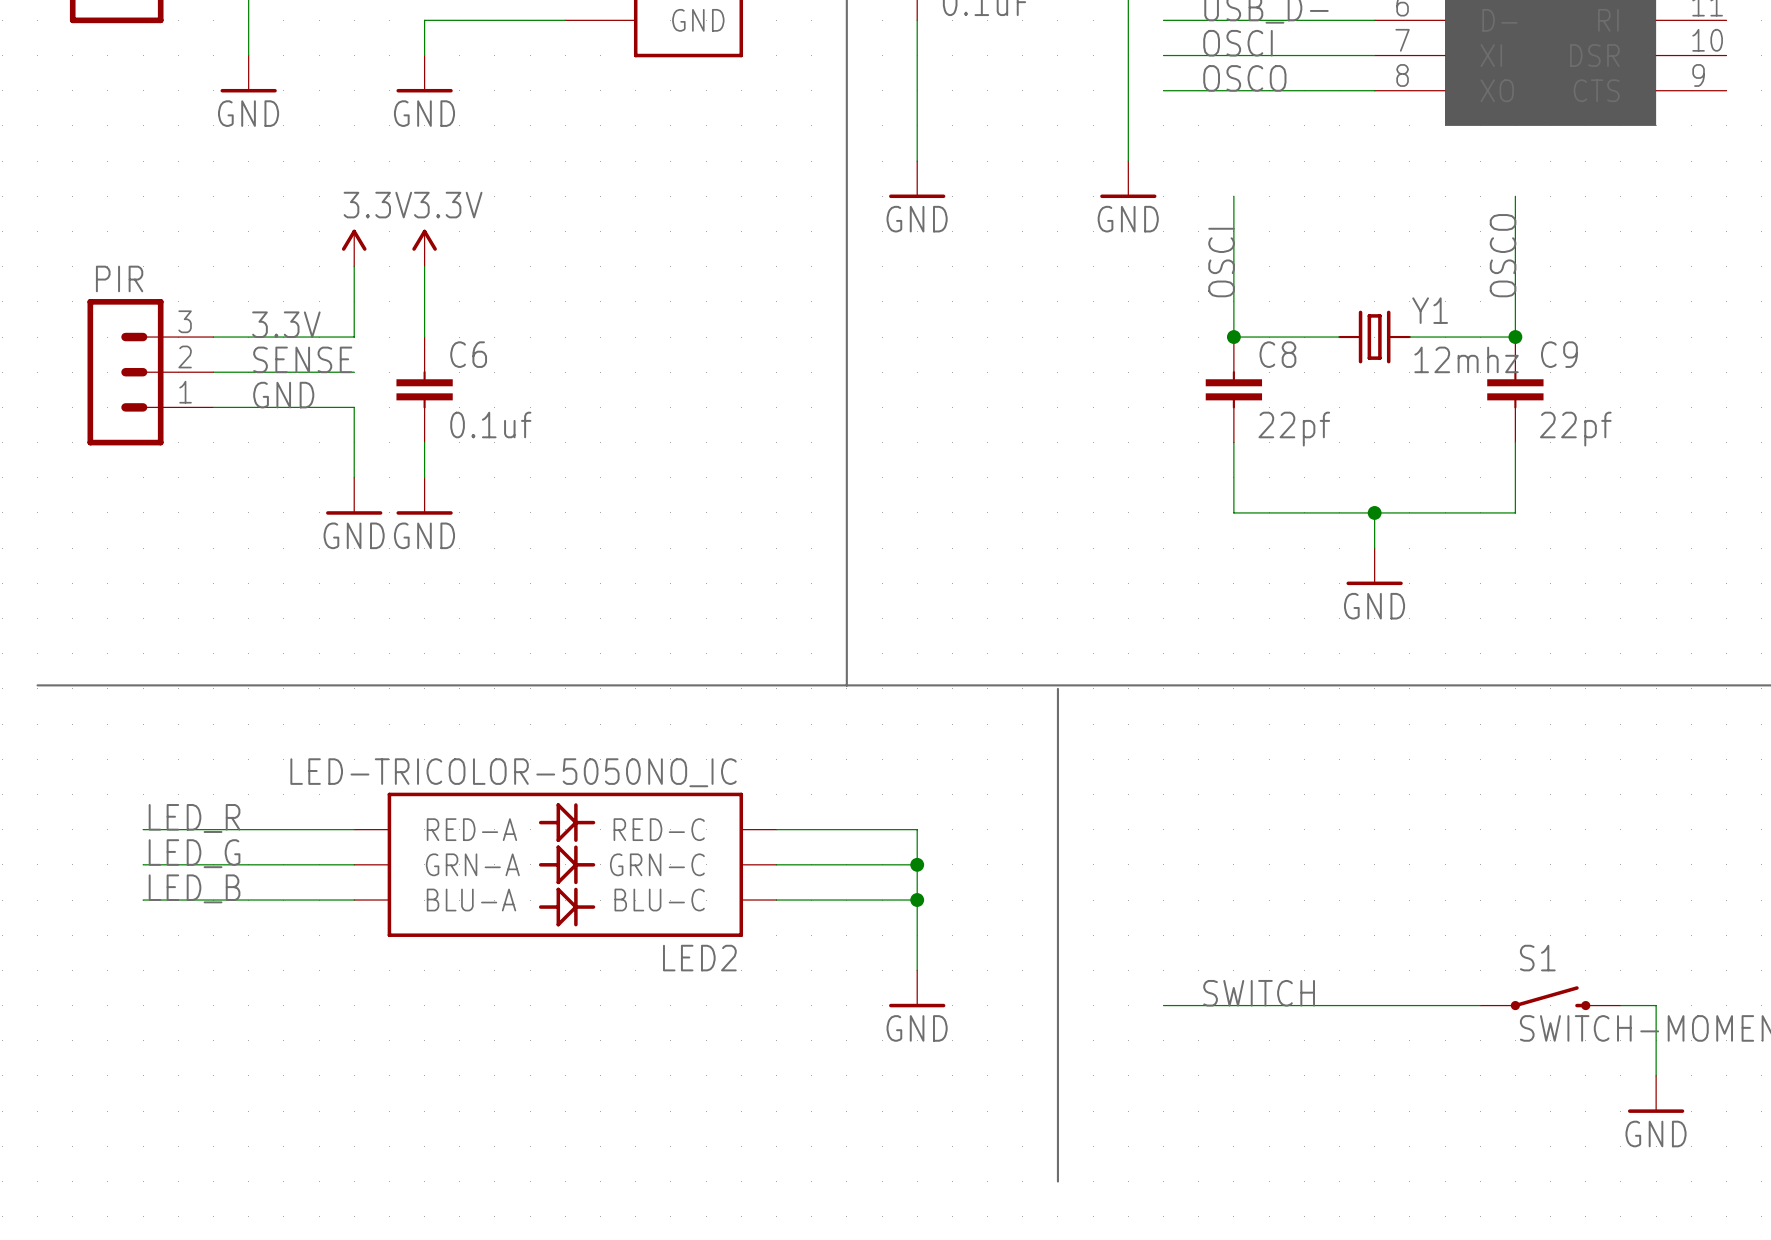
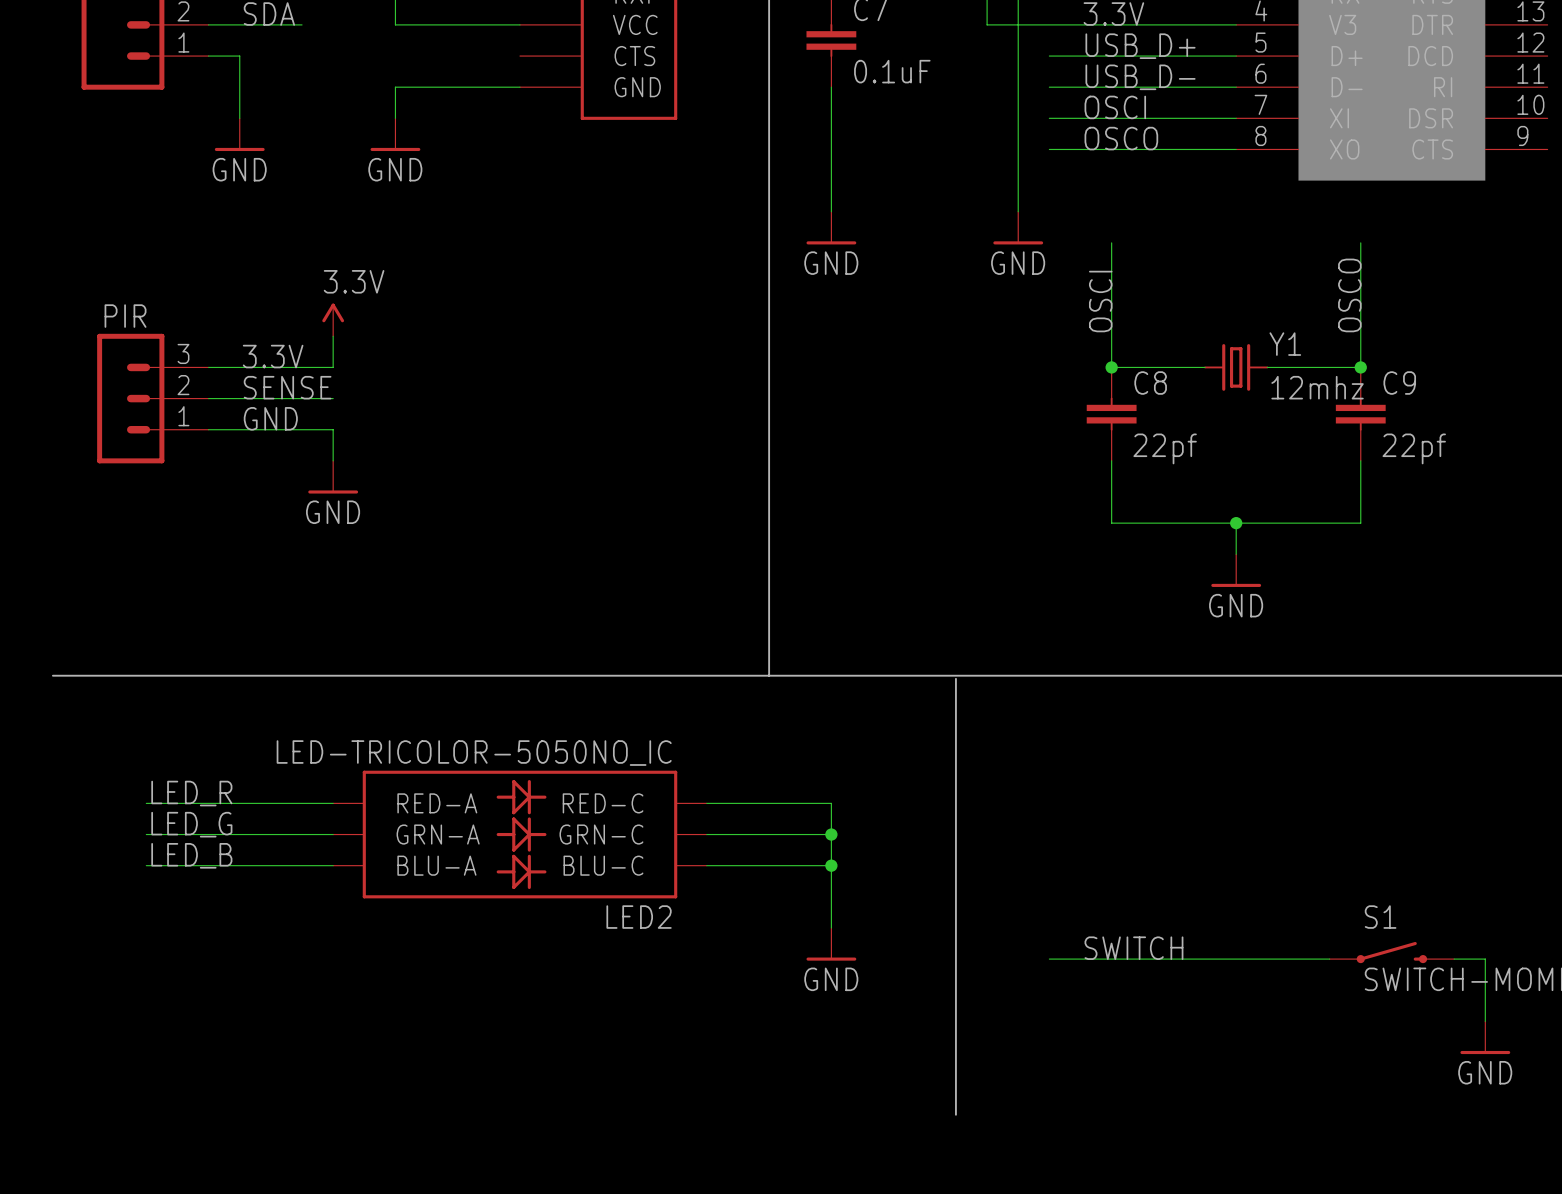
power symbol position: 3.3V (354, 248) -> 3.3V (333, 319)
power symbol: 3.3V (424, 248) -> none
wire: (424, 266) (424, 337) -> none
C6: 0.1uf (424, 389) -> none
wire: (424, 442) (424, 477) -> none
power symbol position: GND (354, 496) -> GND (333, 477)
power symbol: GND (424, 496) -> none

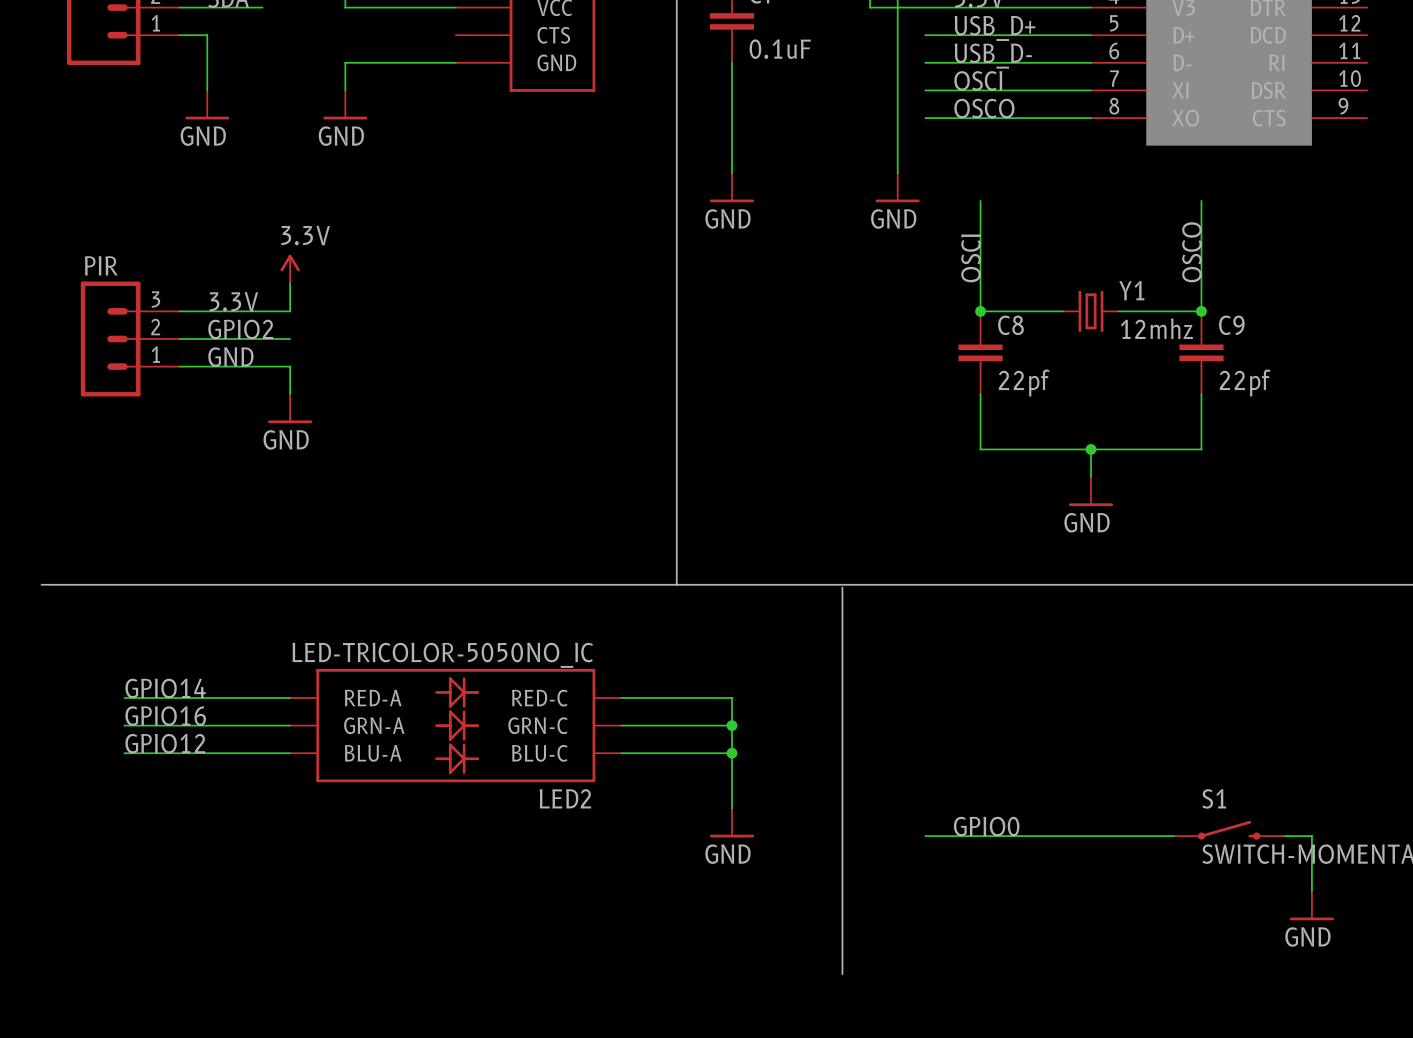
label: SENSE (287, 387) -> GPIO2 (240, 329)
label: LED_R (191, 793) -> GPIO14 (165, 688)
label: LED_G (191, 824) -> GPIO16 (165, 716)
label: LED_B (191, 855) -> GPIO12 (165, 743)
label: SWITCH (1133, 948) -> GPIO0 (986, 826)

